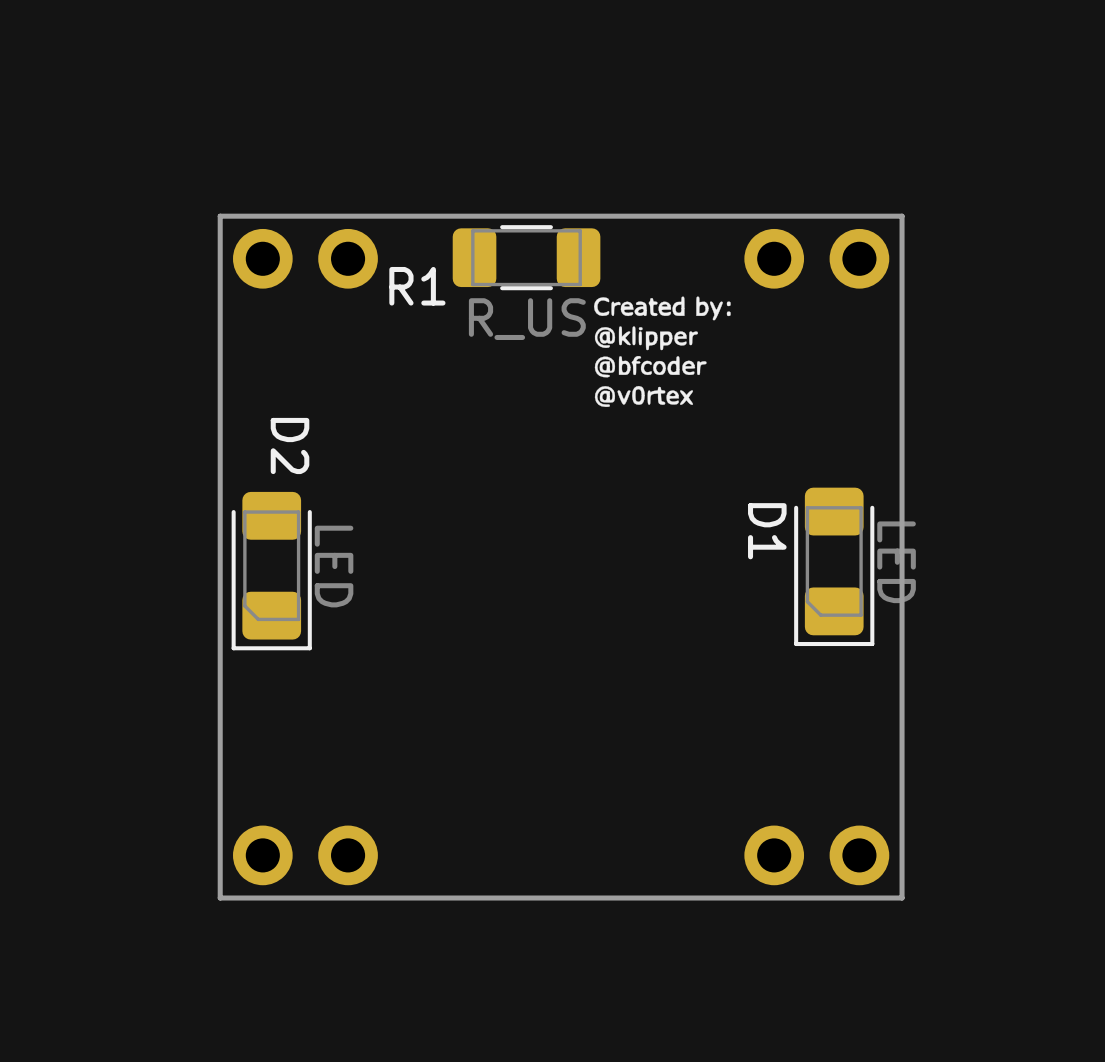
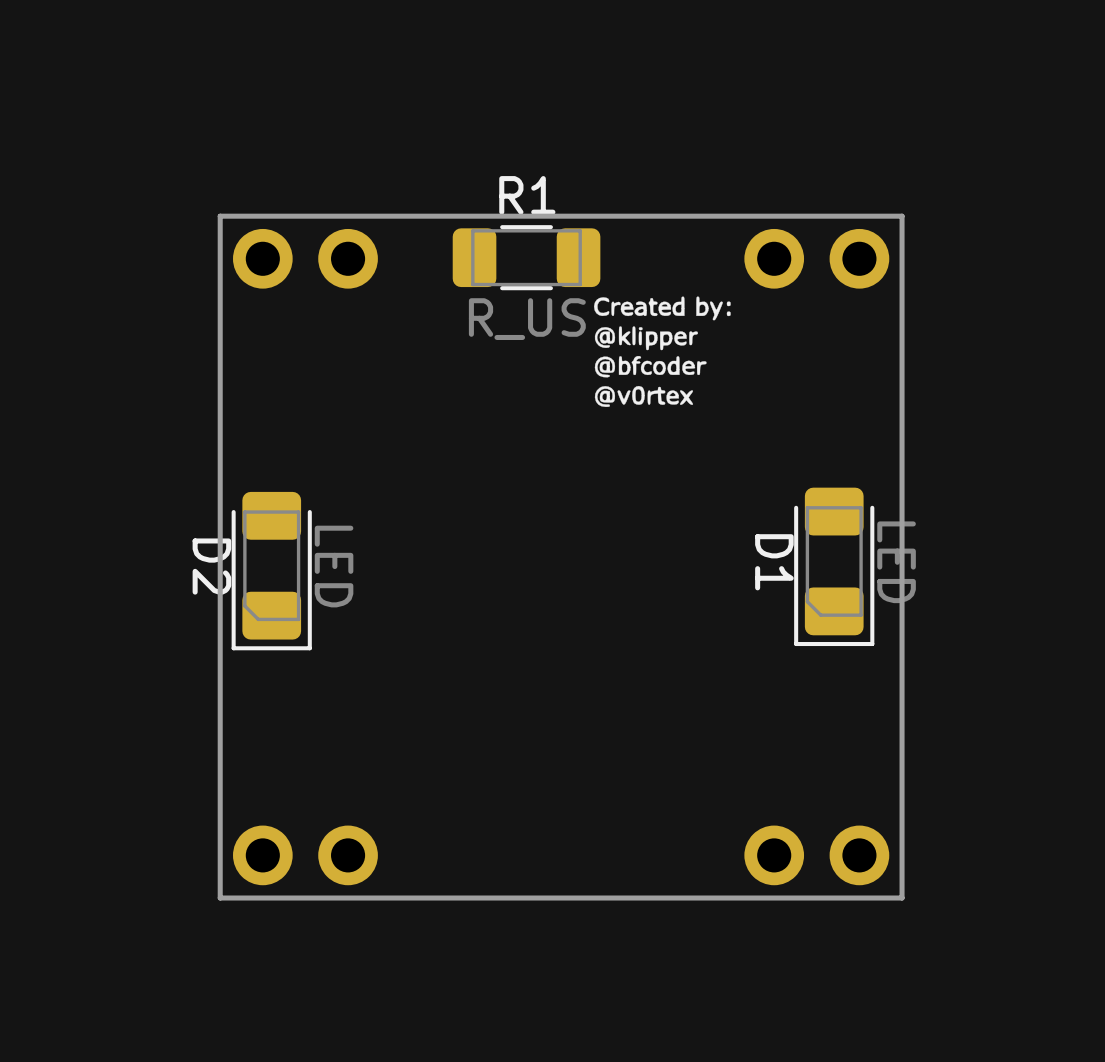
R1 name position: R1 (417, 286) -> R1 (527, 195)
D2 name position: D2 (290, 445) -> D2 (211, 566)
D1 name position: D1 (767, 531) -> D1 (774, 562)

